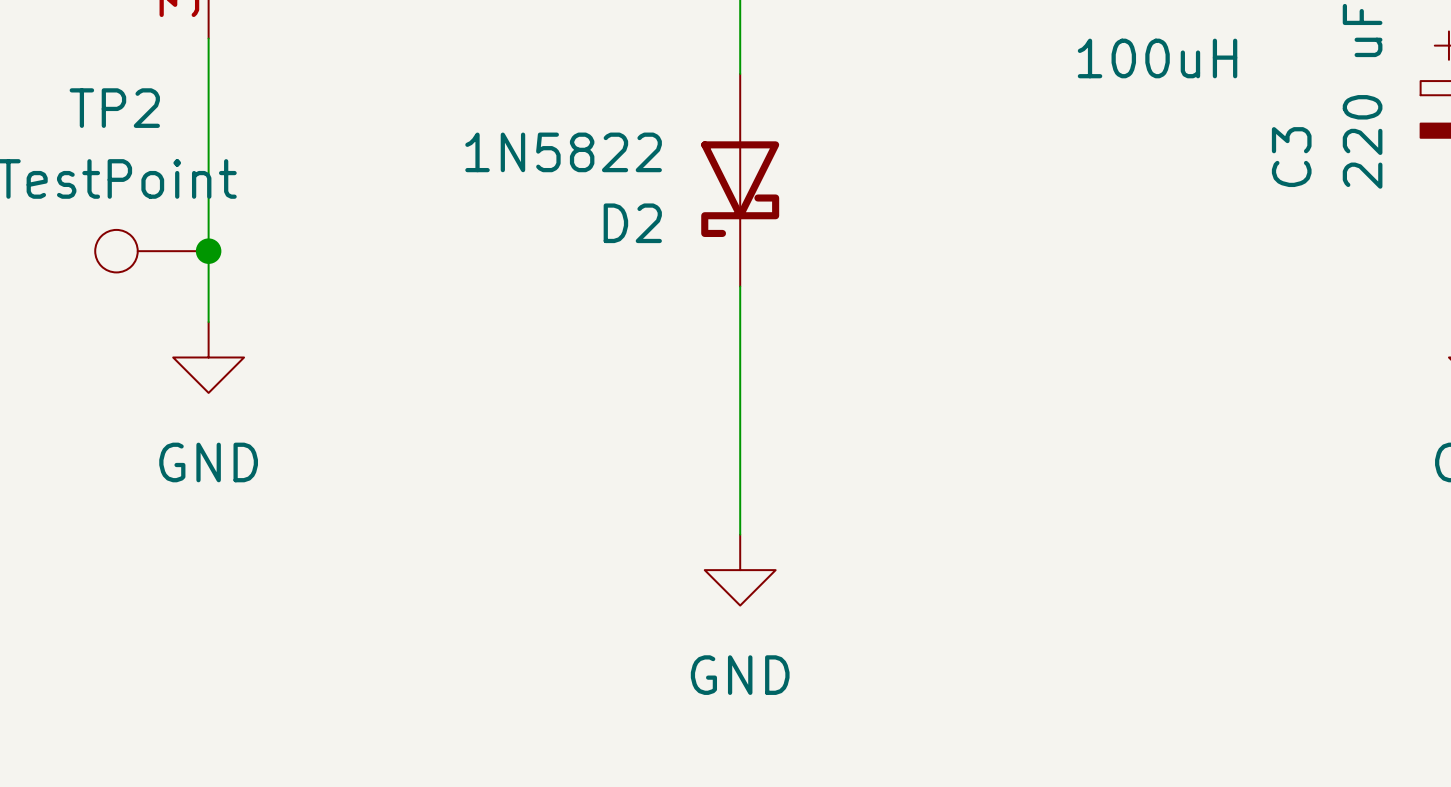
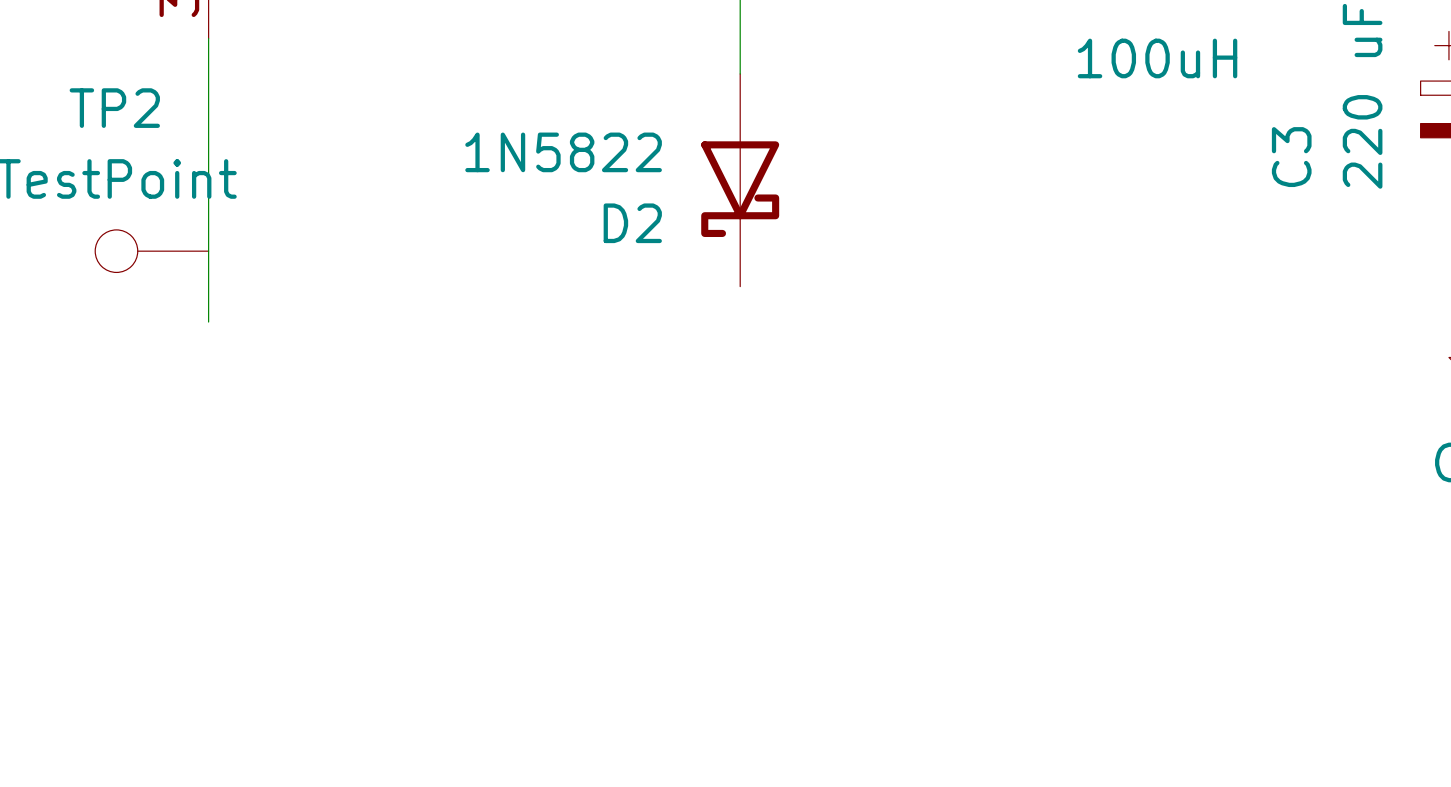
junction: (208, 251) -> none
wire: (740, 286) (740, 534) -> none
power symbol: GND (208, 357) -> none
power symbol: GND (740, 570) -> none

